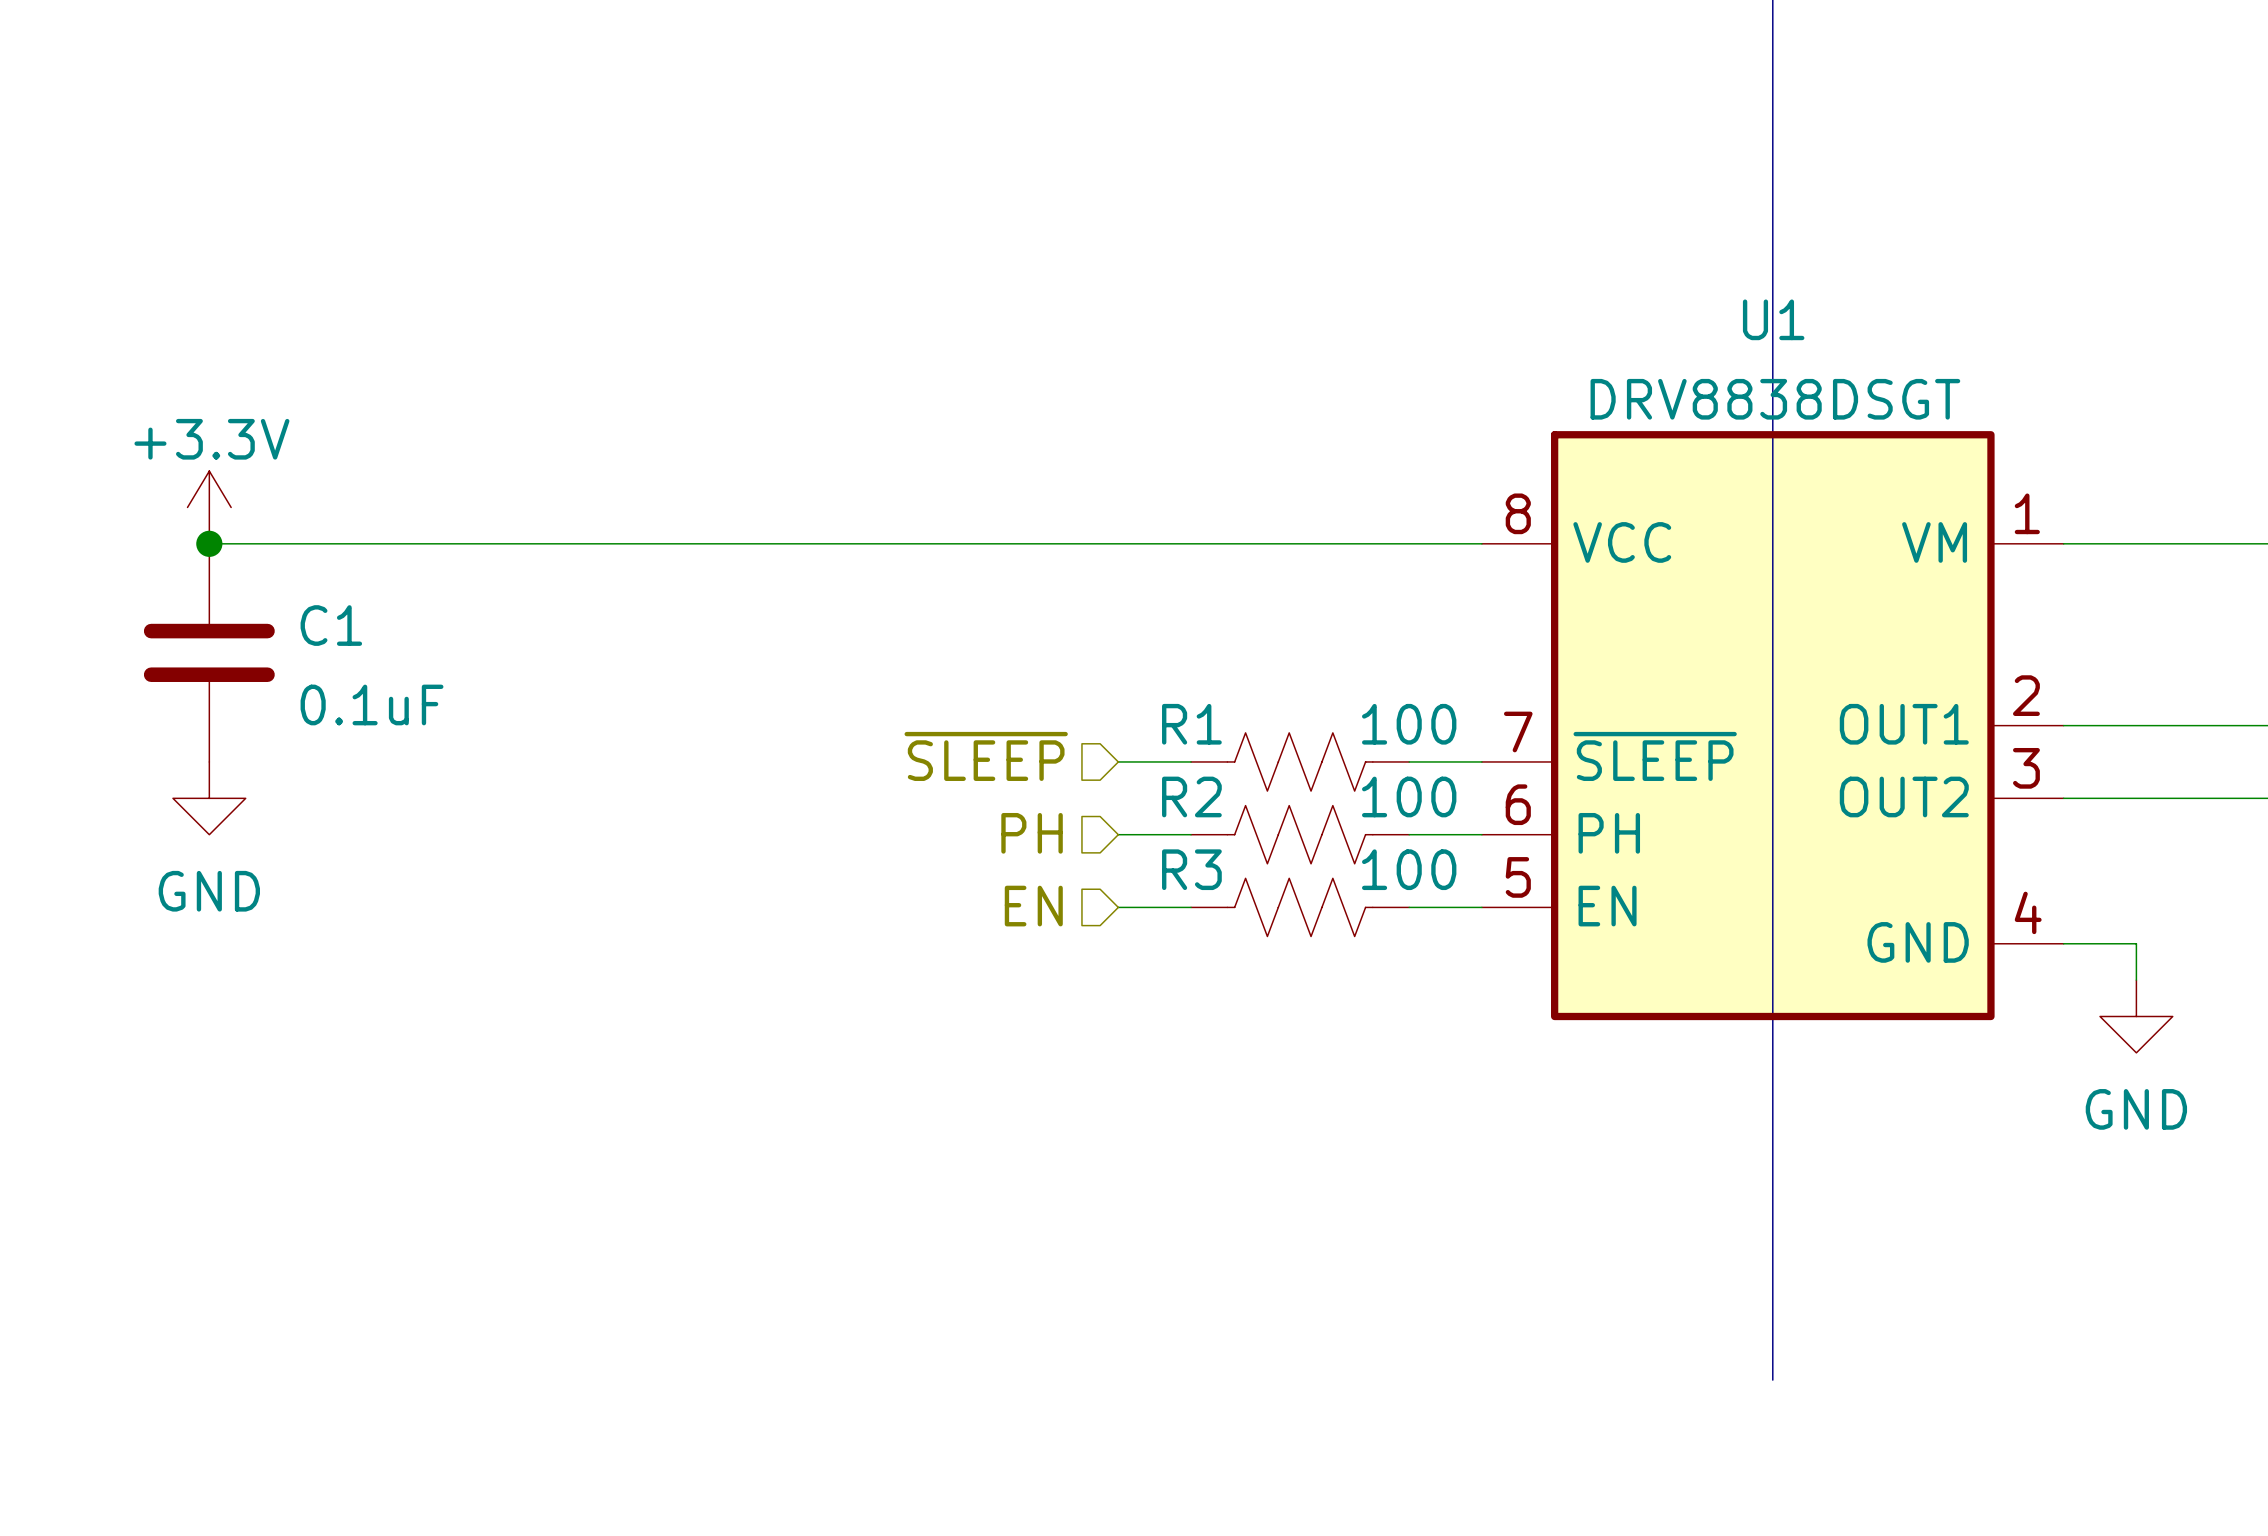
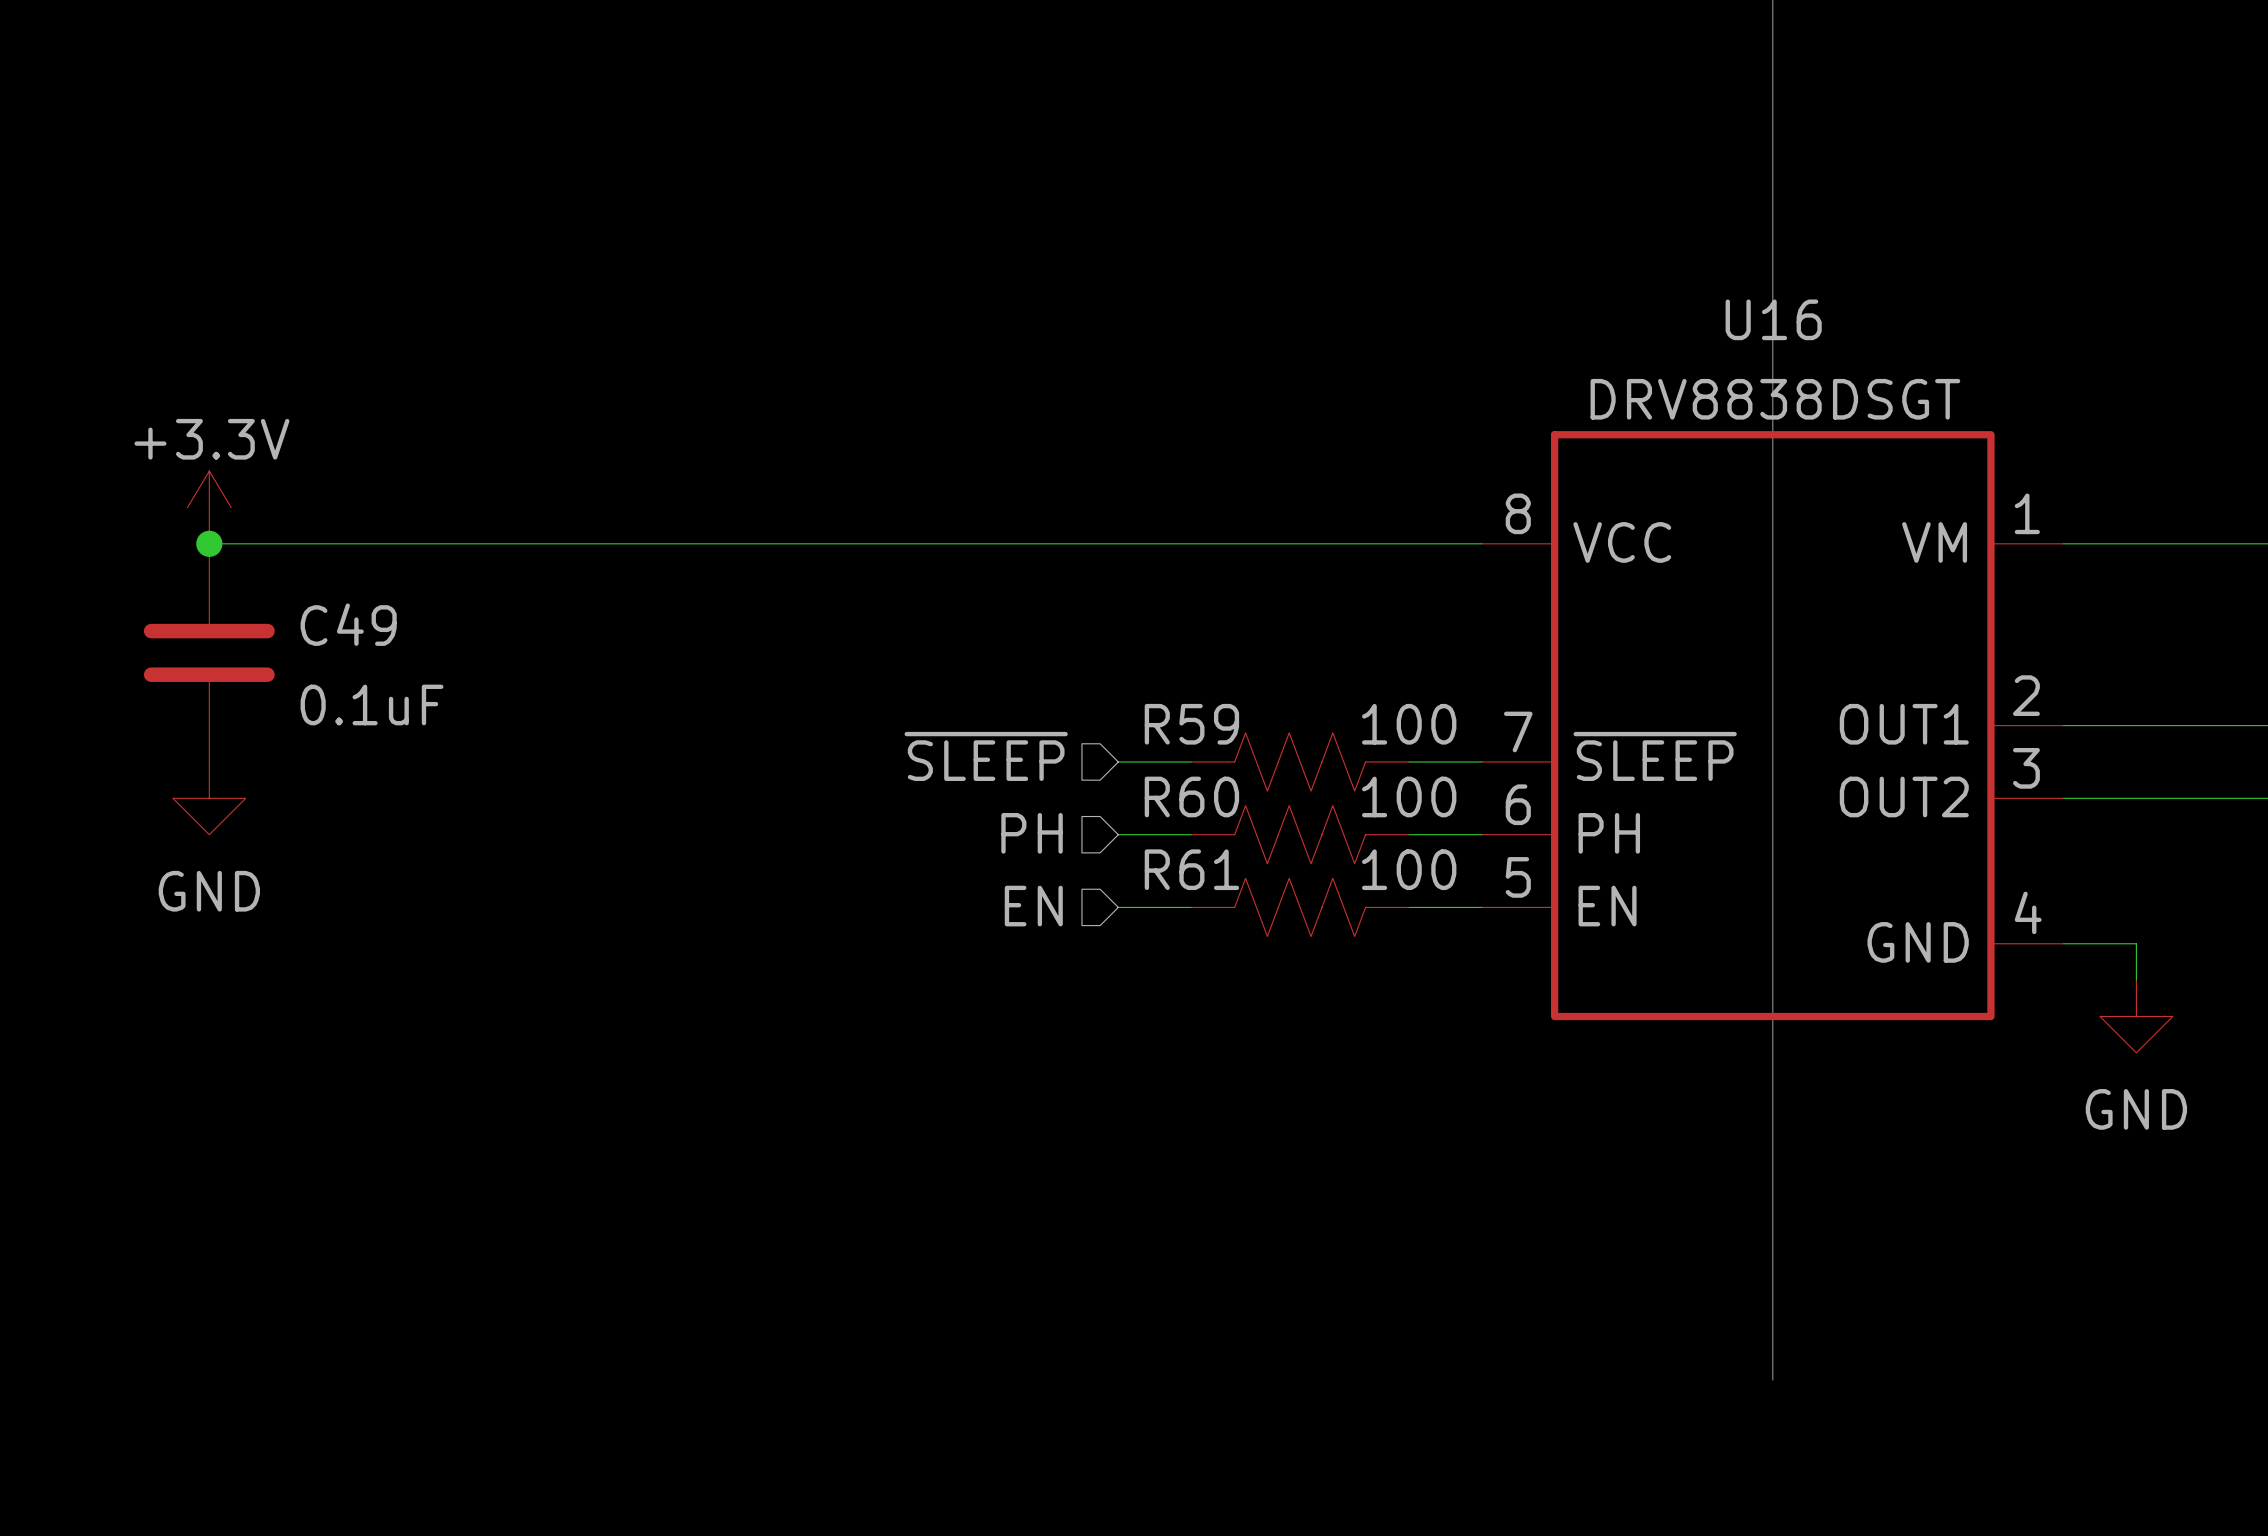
U1 name: U1 (1773, 319) -> U16 (1773, 319)
C1 name: C1 (331, 625) -> C49 (348, 624)
R1 name: R1 (1191, 724) -> R59 (1191, 724)
R2 name: R2 (1191, 796) -> R60 (1191, 796)
R3 name: R3 (1191, 869) -> R61 (1191, 869)

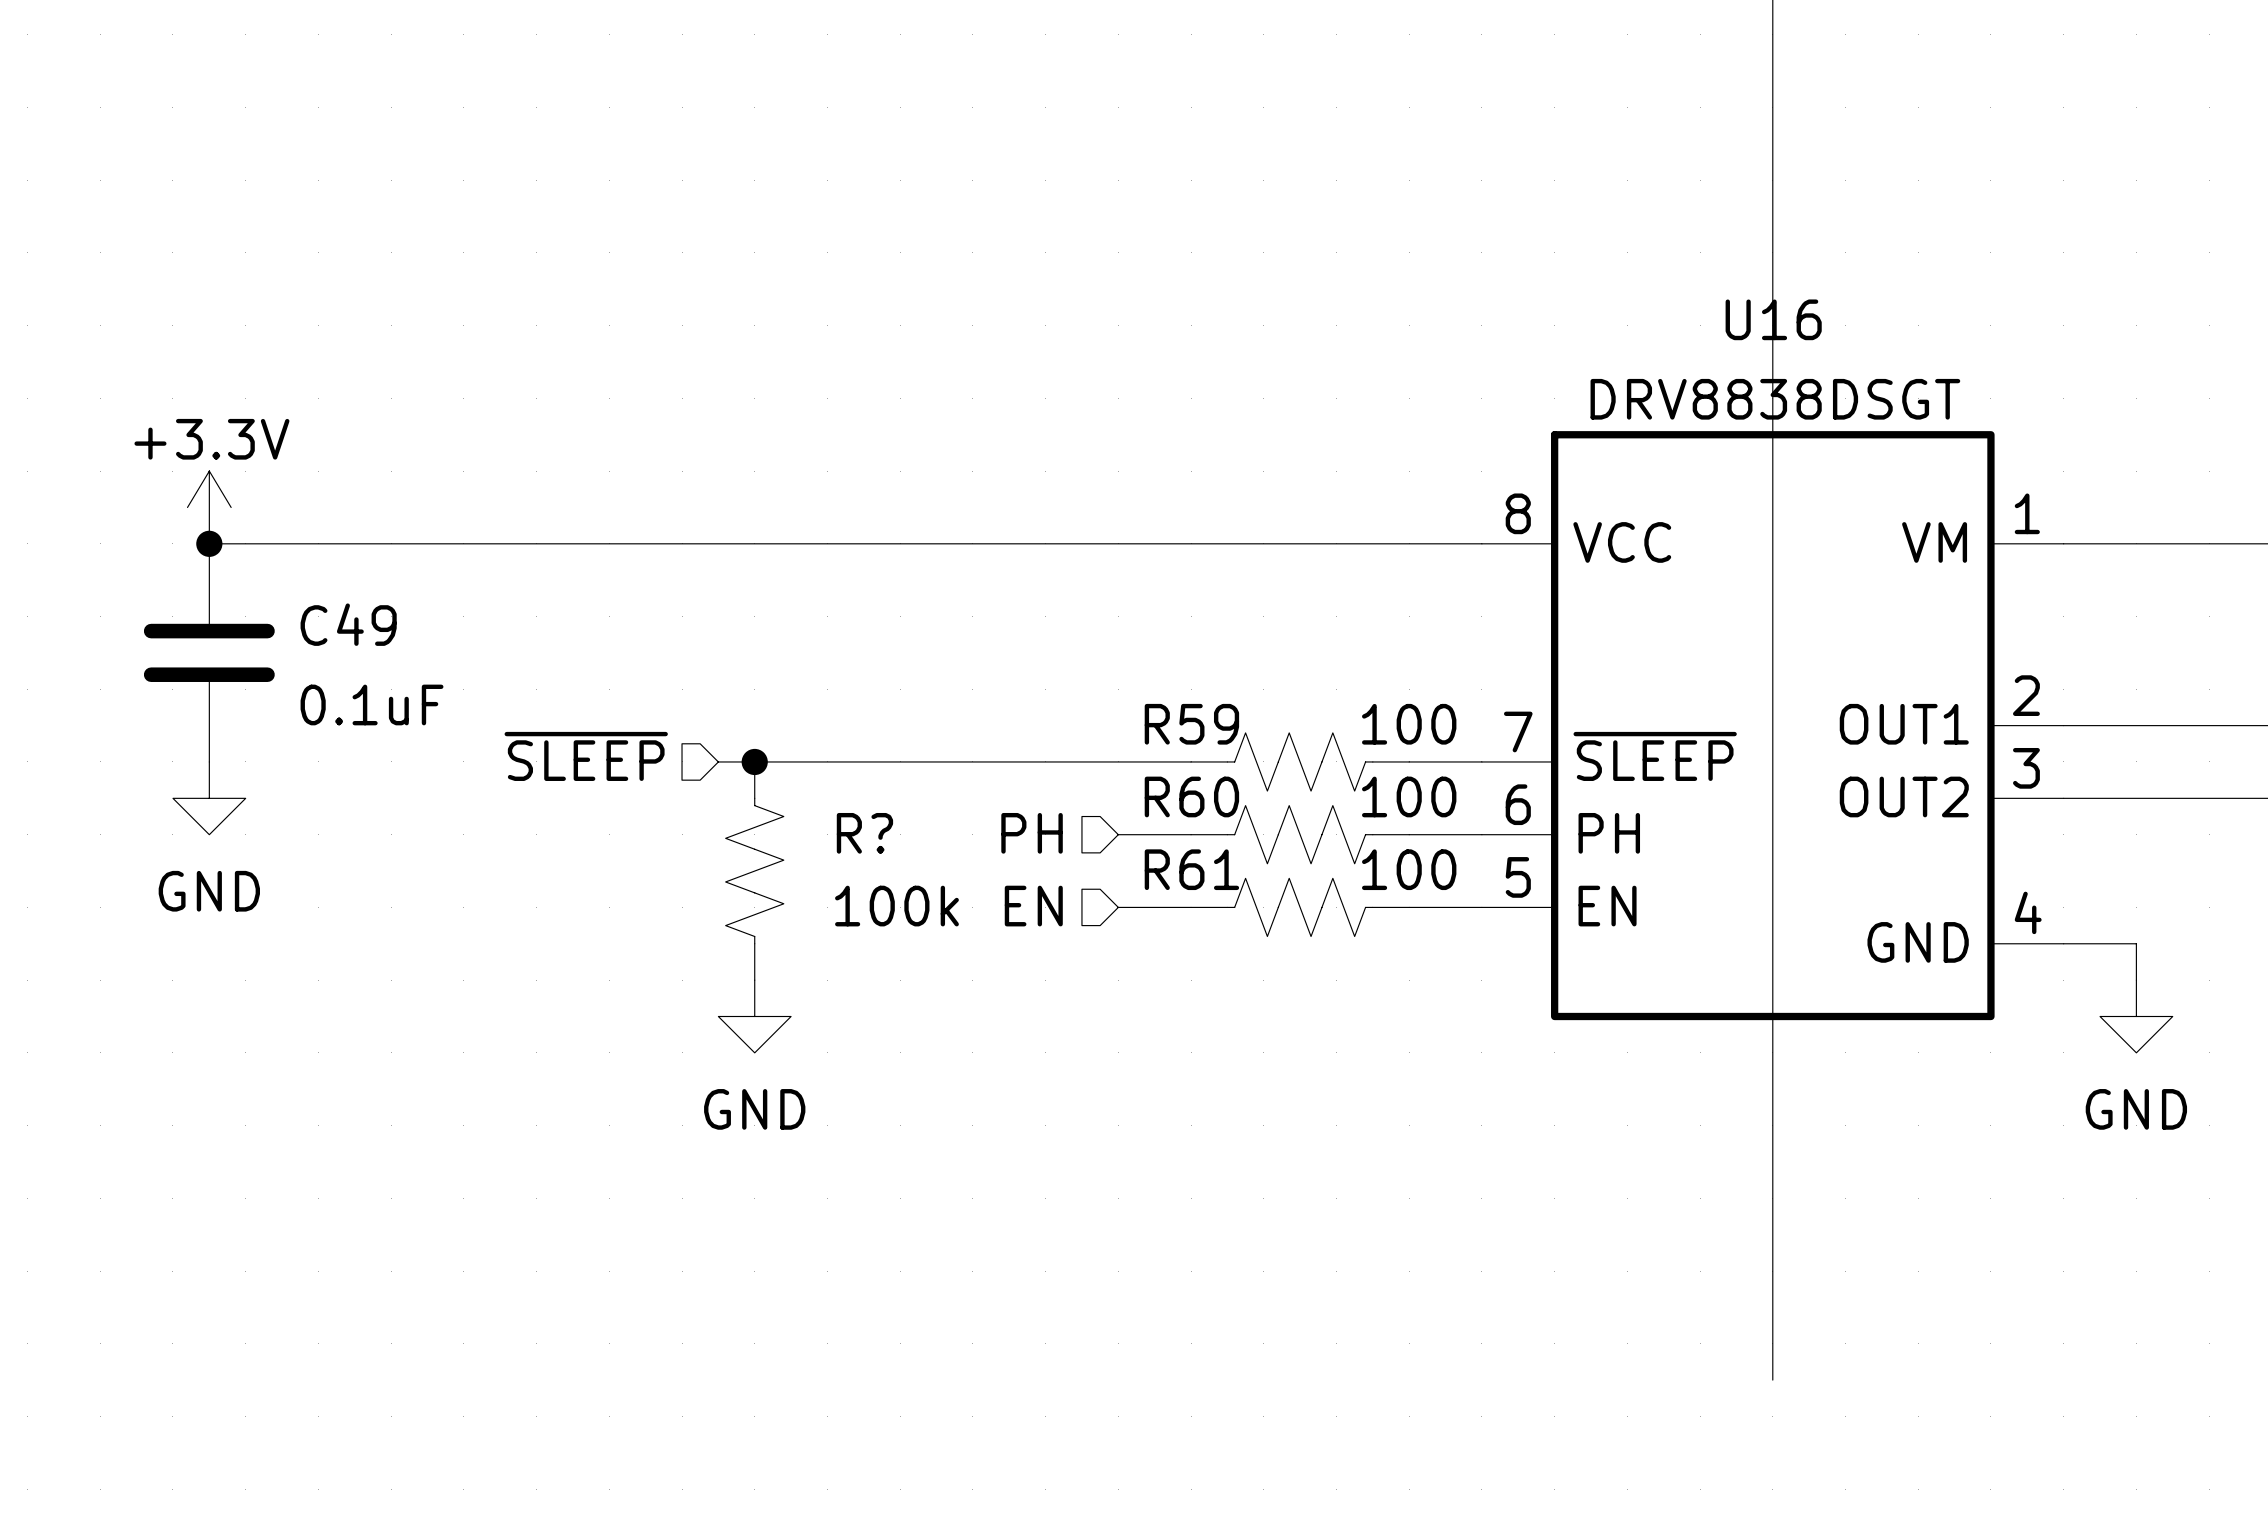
hierarchical label position: ~{SLEEP} (986, 756) -> ~{SLEEP} (586, 756)
wire: none -> (718, 761) (1118, 761)
junction: none -> (754, 761)
R?: none -> 100k (754, 871)
power symbol: none -> GND (754, 1016)

